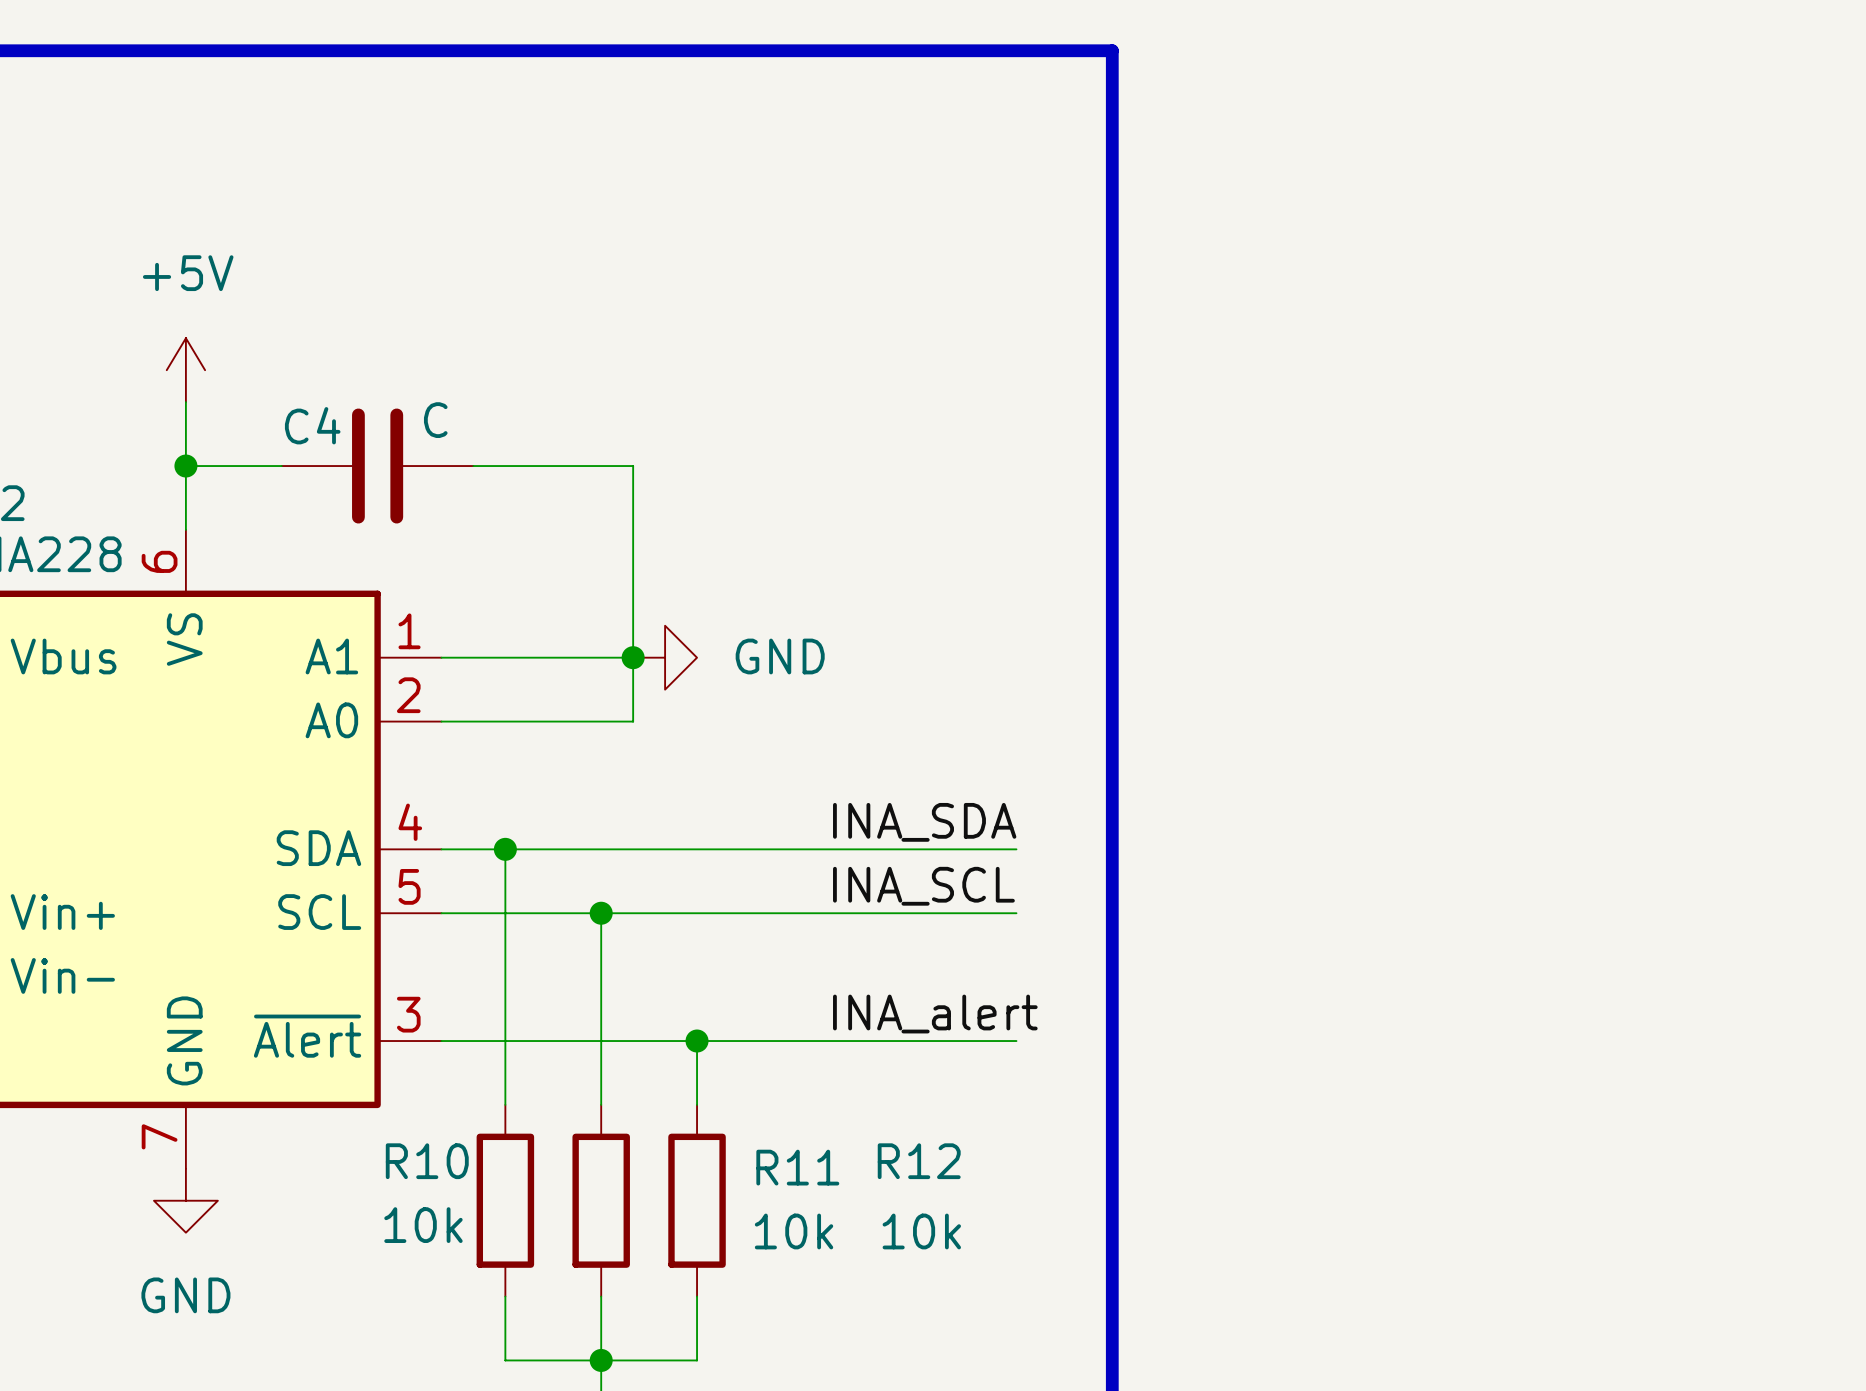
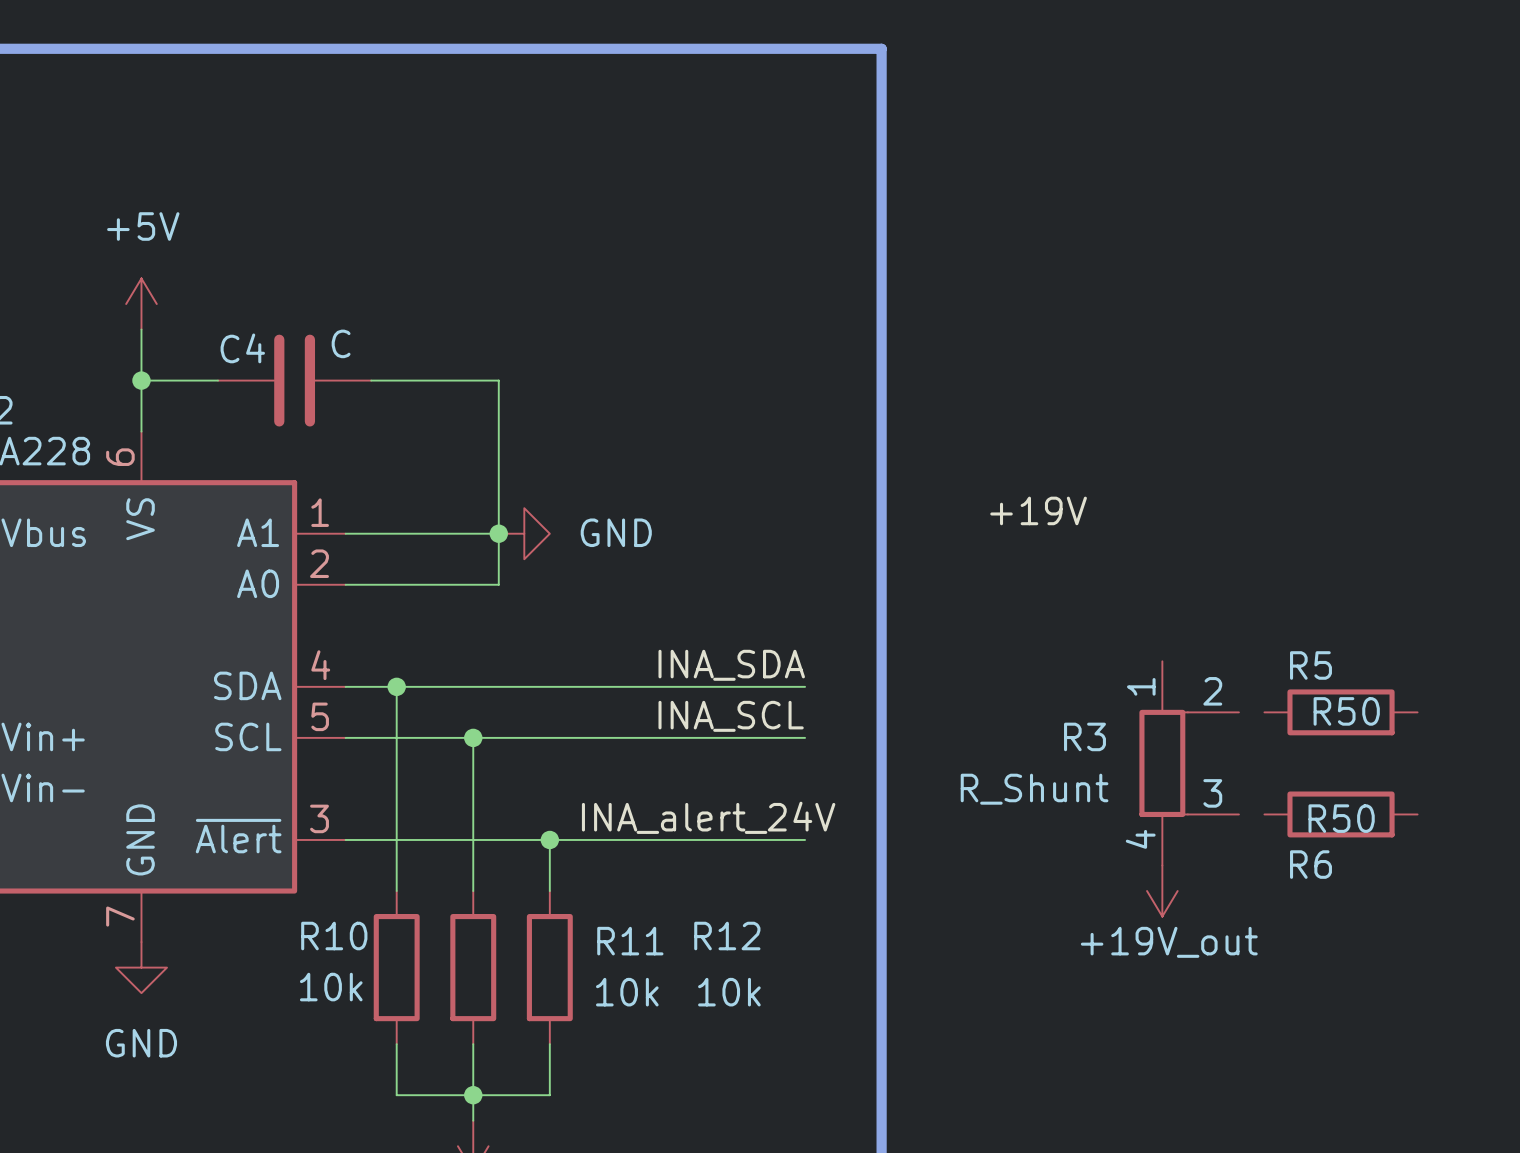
label: none -> +19V (1038, 510)
R5: none -> R50 (1341, 712)
R3: none -> R_Shunt (1189, 763)
R6: none -> R50 (1341, 814)
label: INA_alert (935, 1014) -> INA_alert_24V (708, 817)
power symbol: none -> +19V_out (1162, 891)

